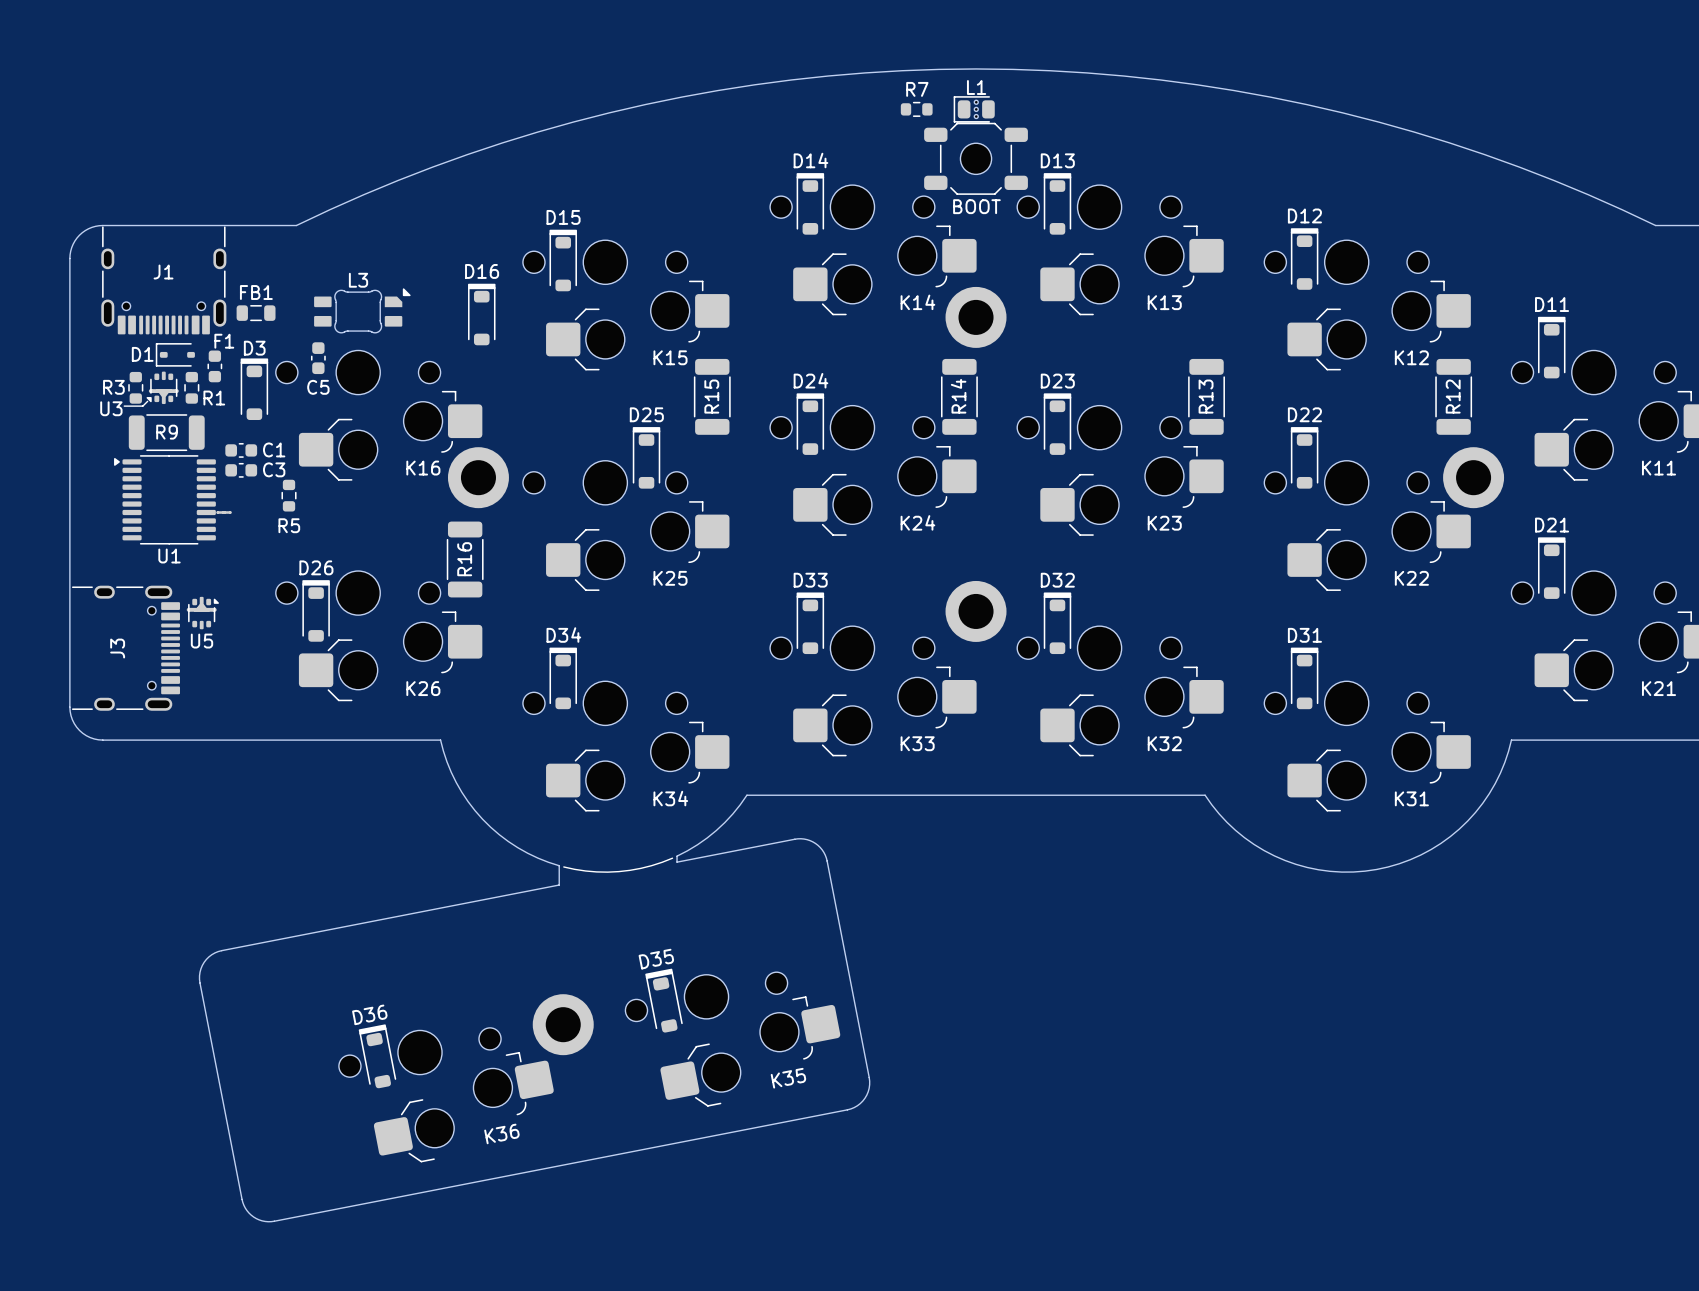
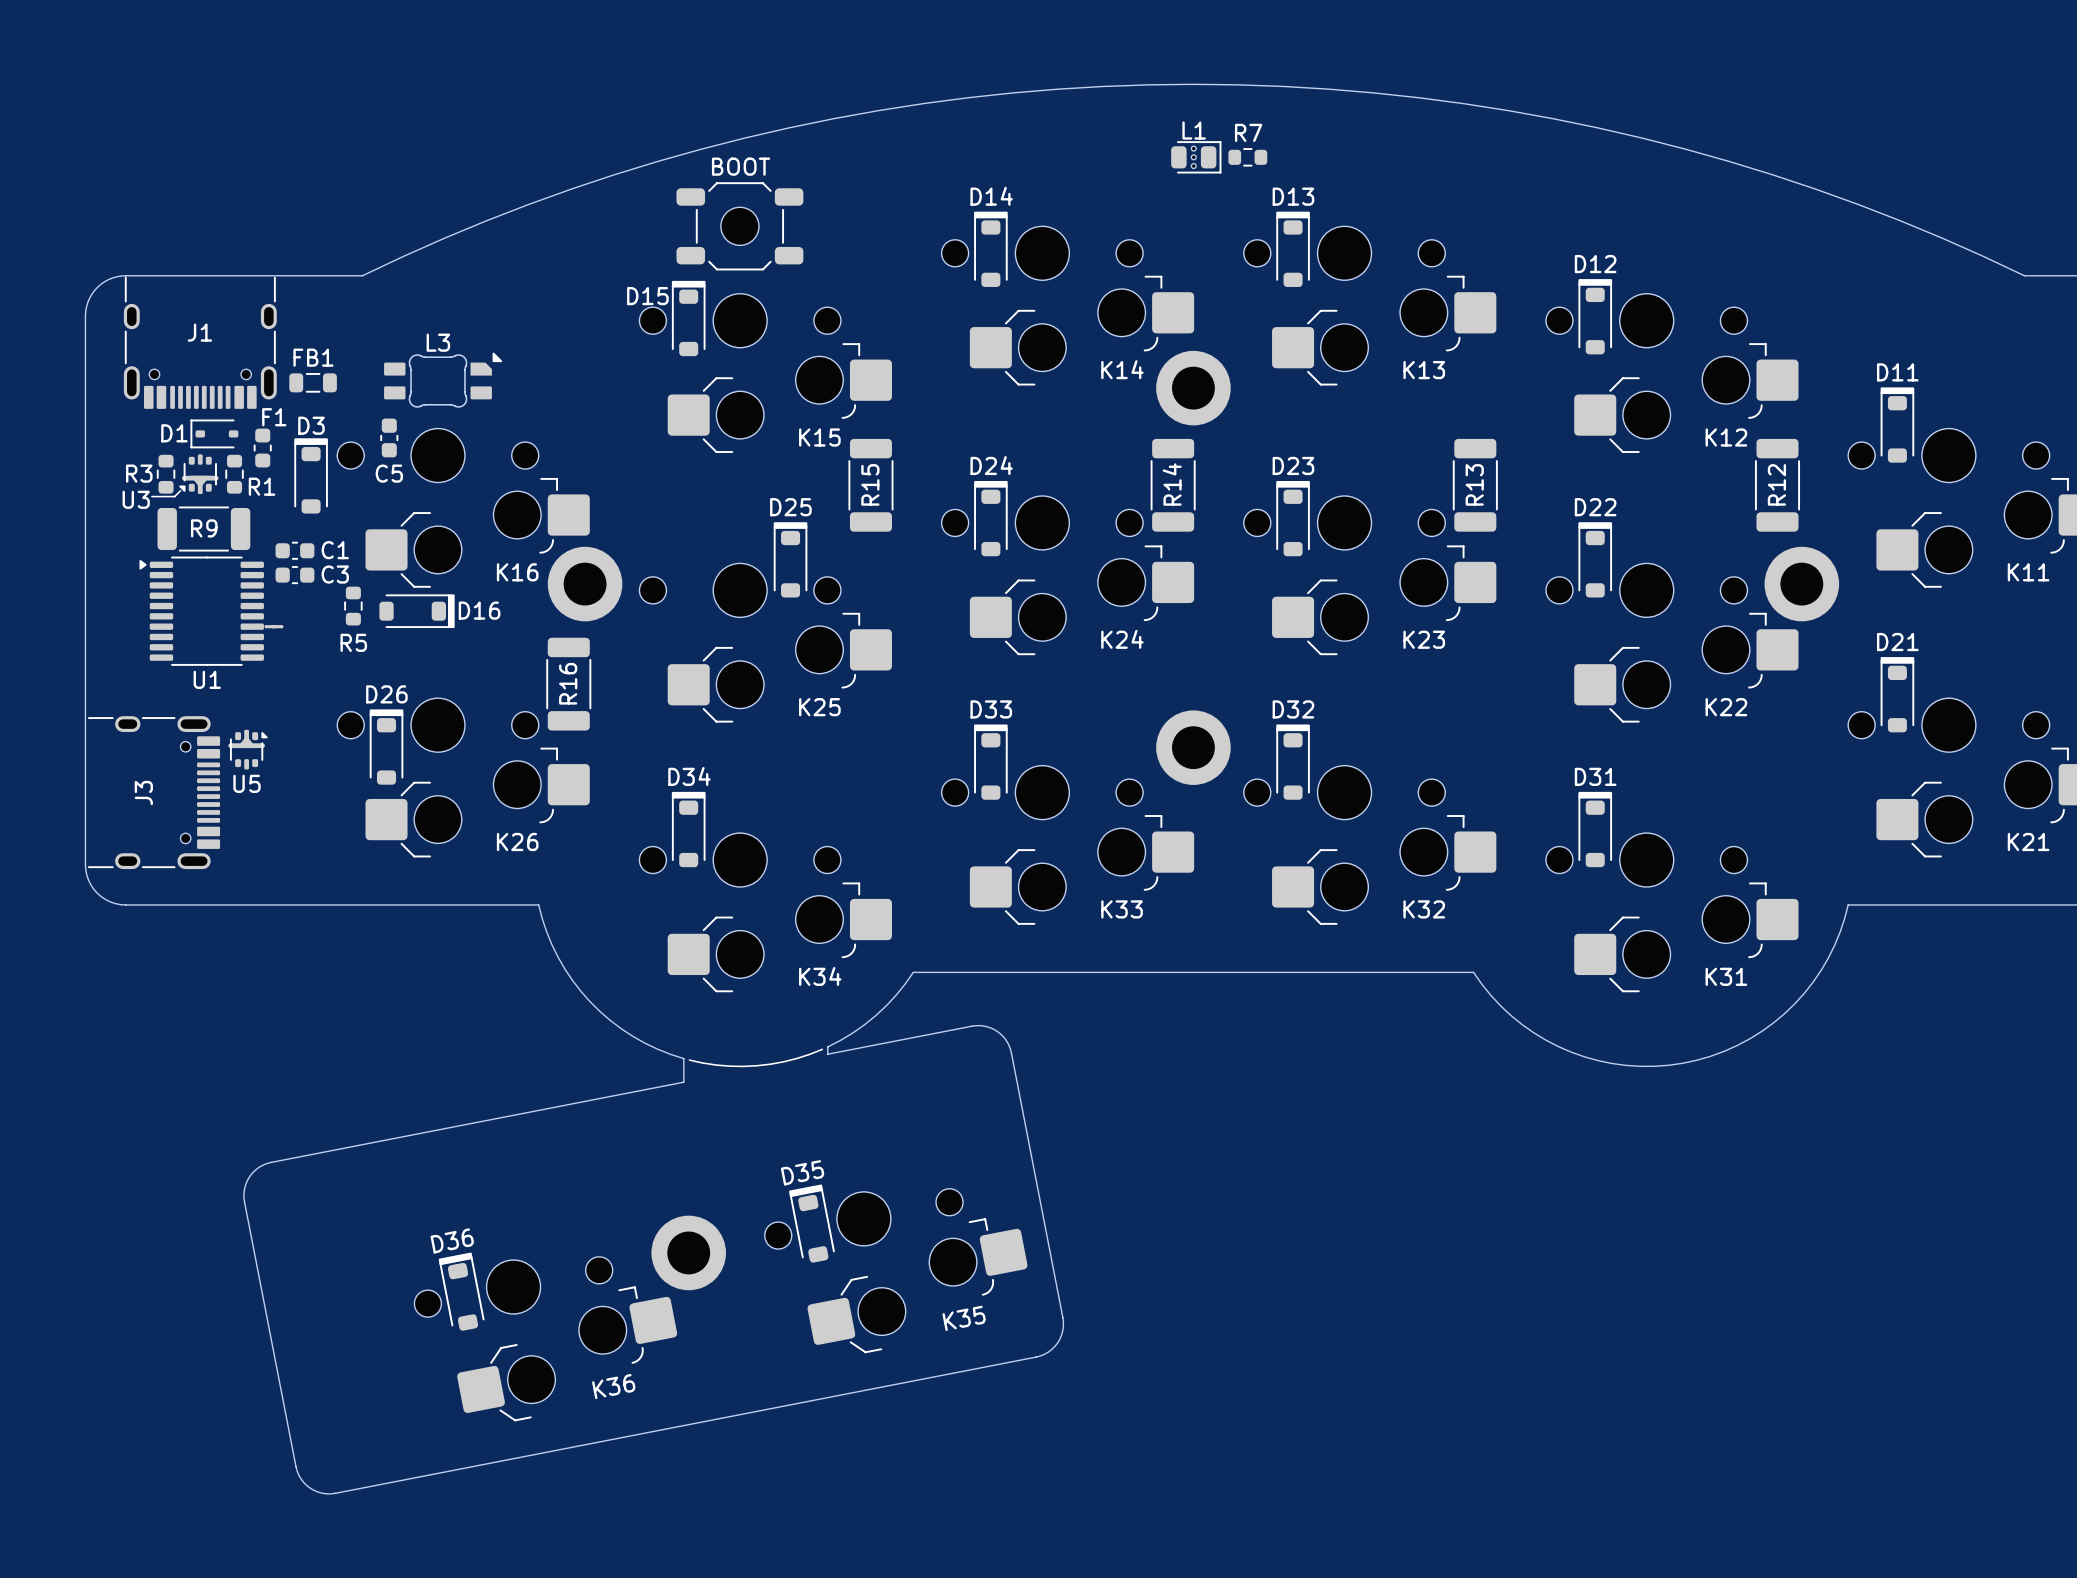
R7 position: (916, 109) -> (1247, 157)
L1 rotation: 0° (974, 109) -> 180° (1196, 157)
part: BOOT (976, 158) -> none
part: none -> BOOT (739, 226)
D15 name position: D15 (563, 217) -> D15 (647, 296)
D16 rotation: 0° (481, 314) -> 90° clockwise (417, 611)
D16 position: (481, 314) -> (417, 611)

